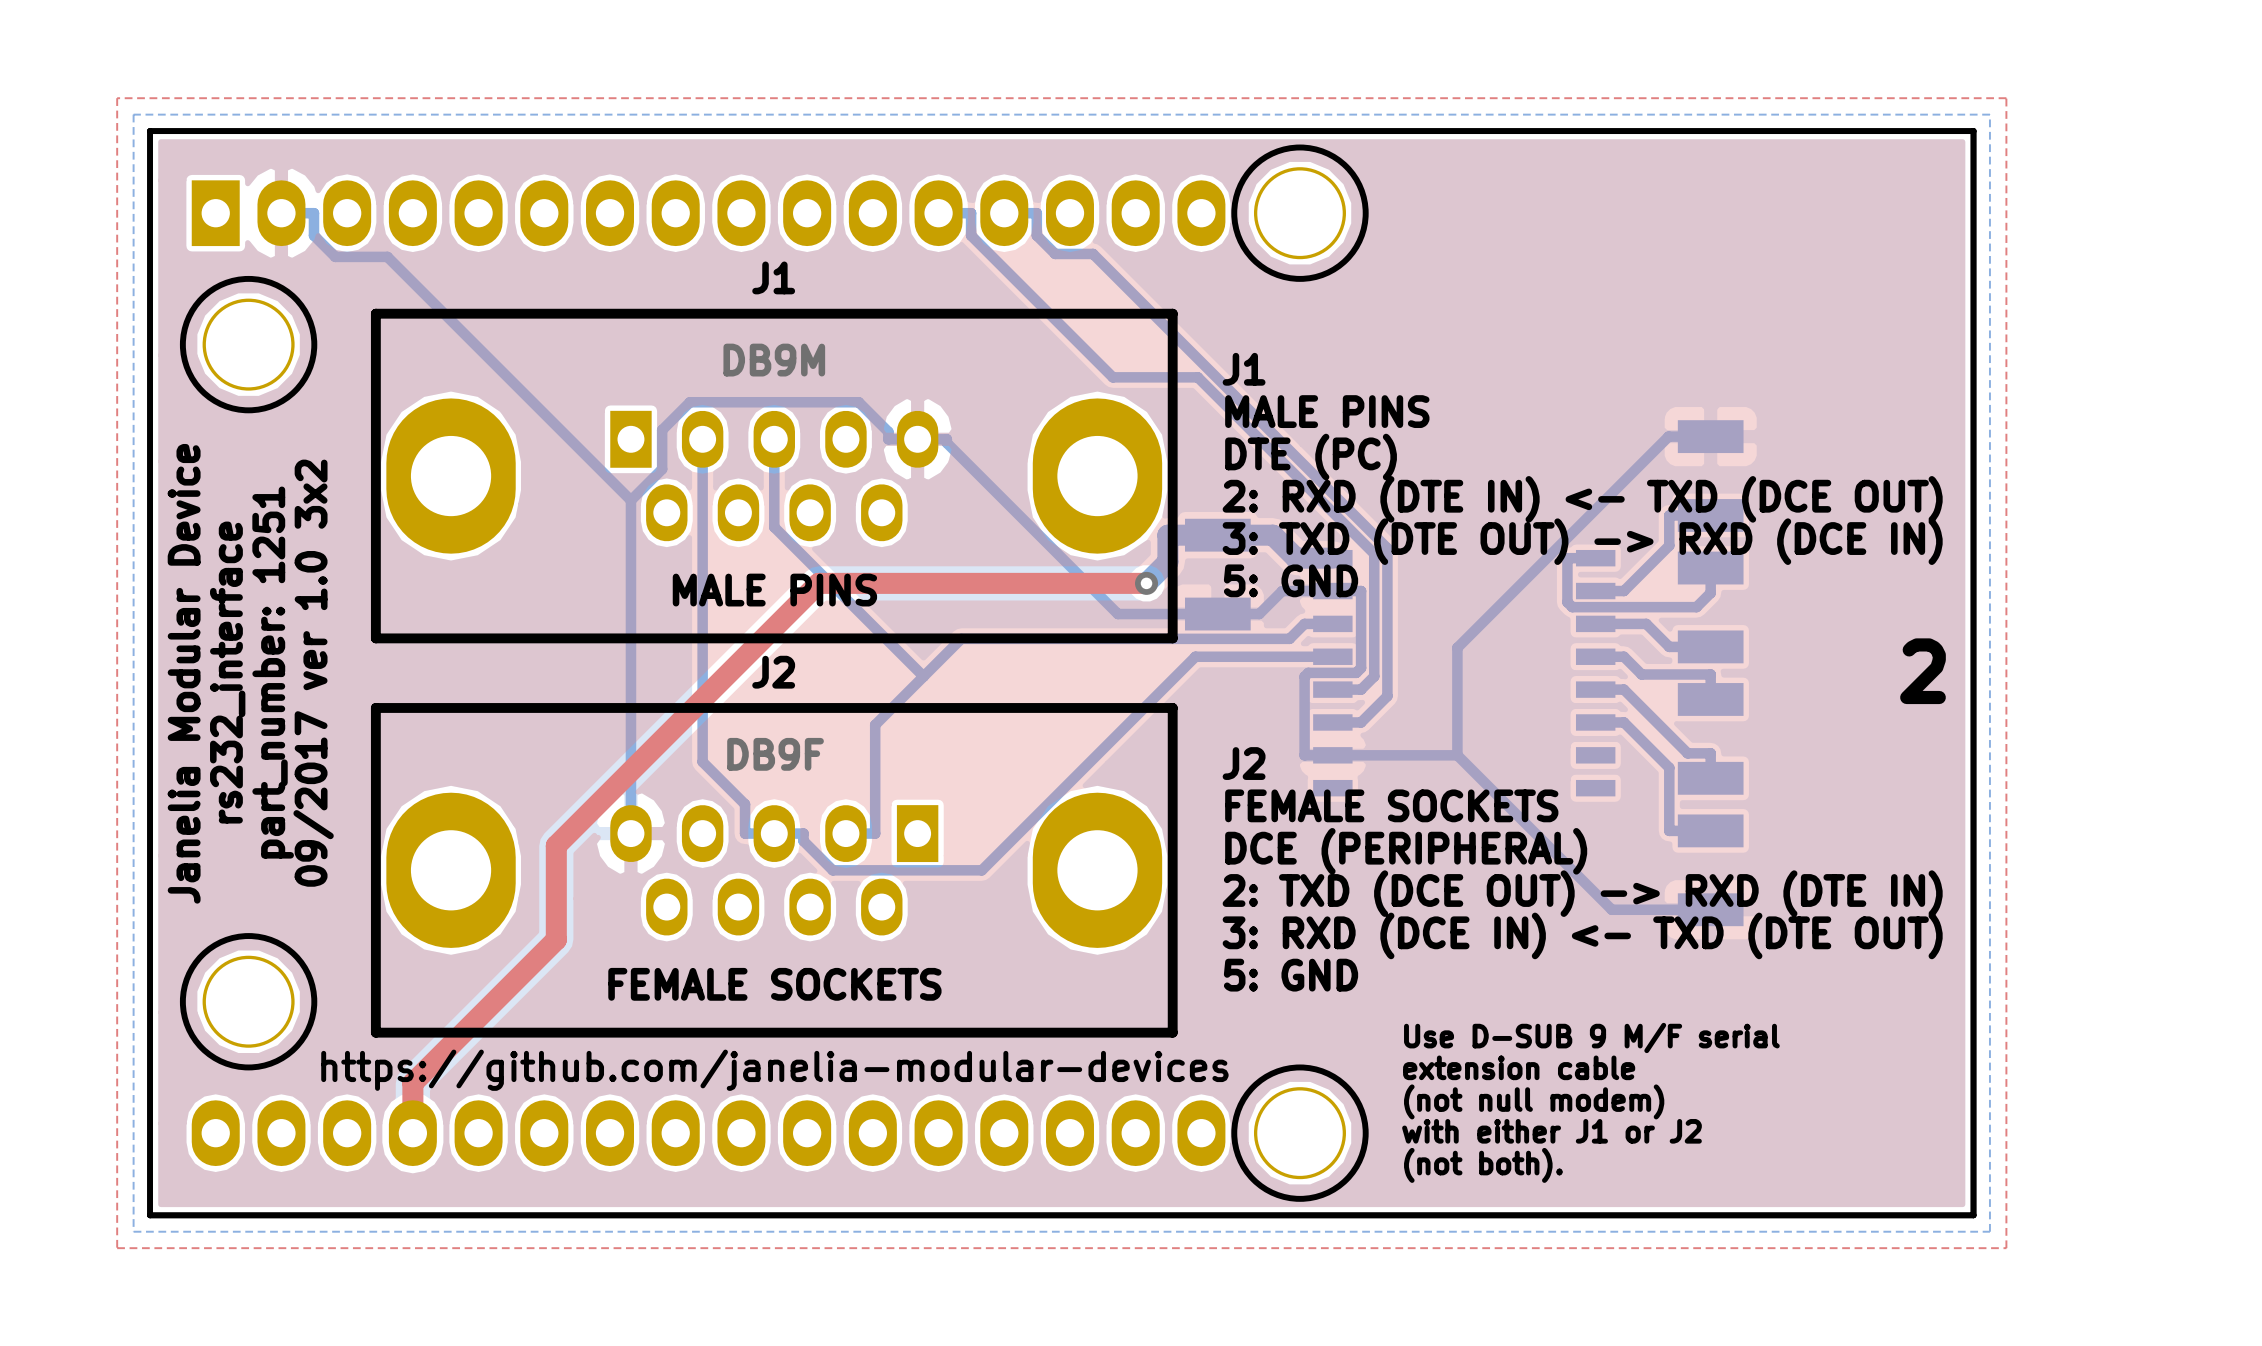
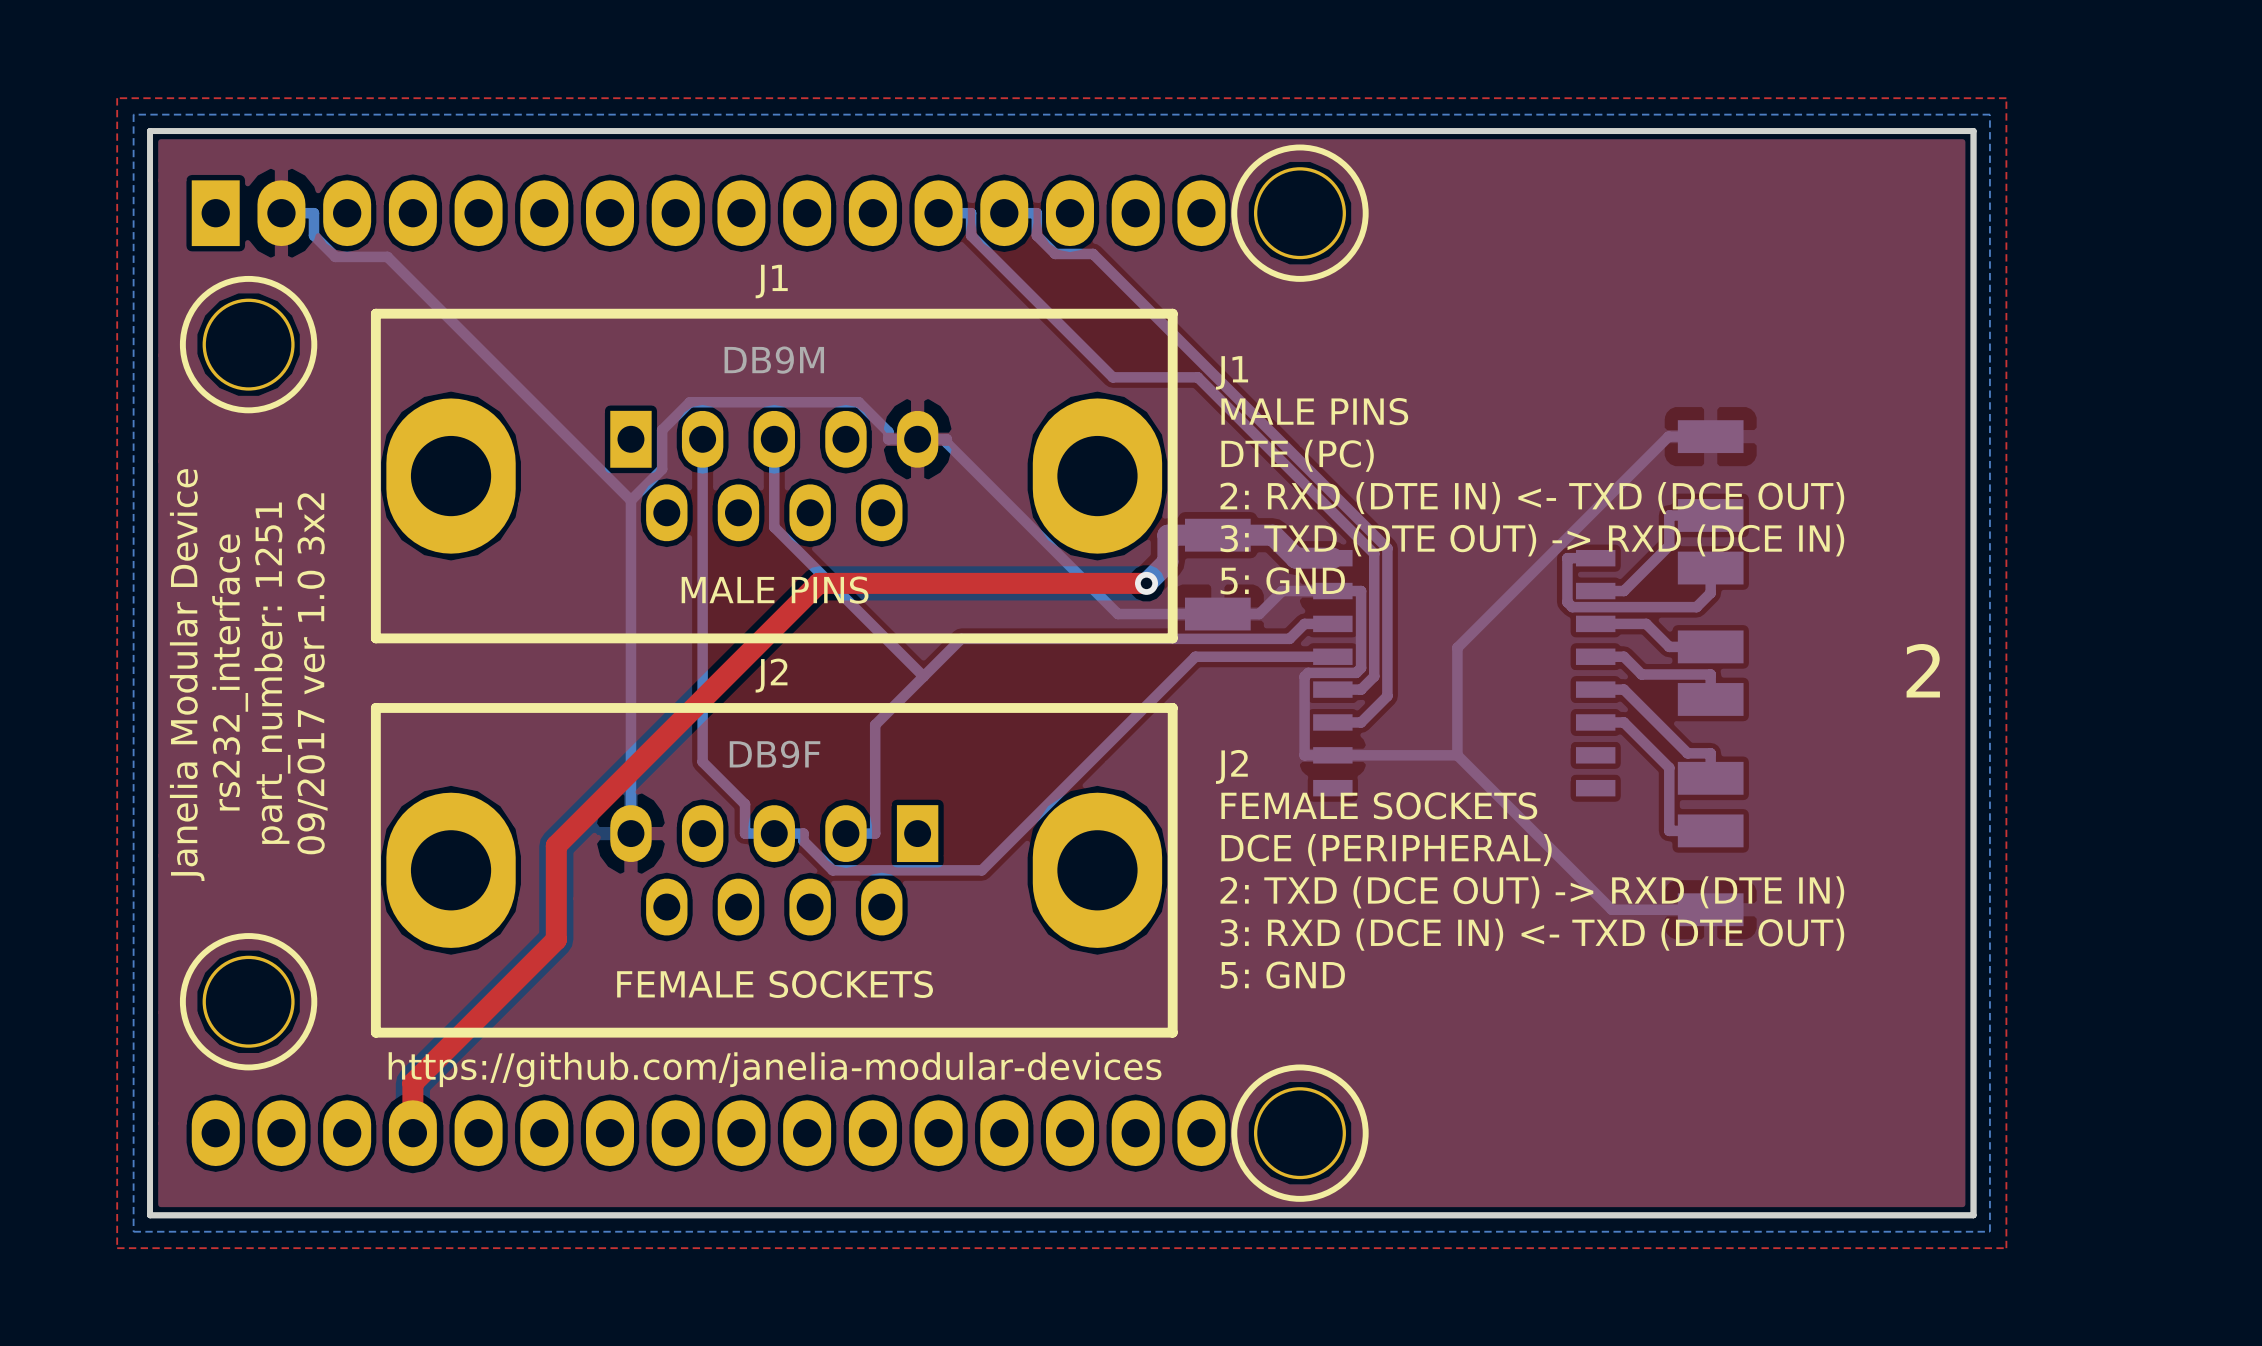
text: Use D-SUB 9 M/F serial (1591, 1037) -> none
text: extension cable (1519, 1067) -> none
text: (not null modem) (1534, 1101) -> none
text: with either J1 or J2 (1551, 1131) -> none
text: (not both). (1483, 1165) -> none

